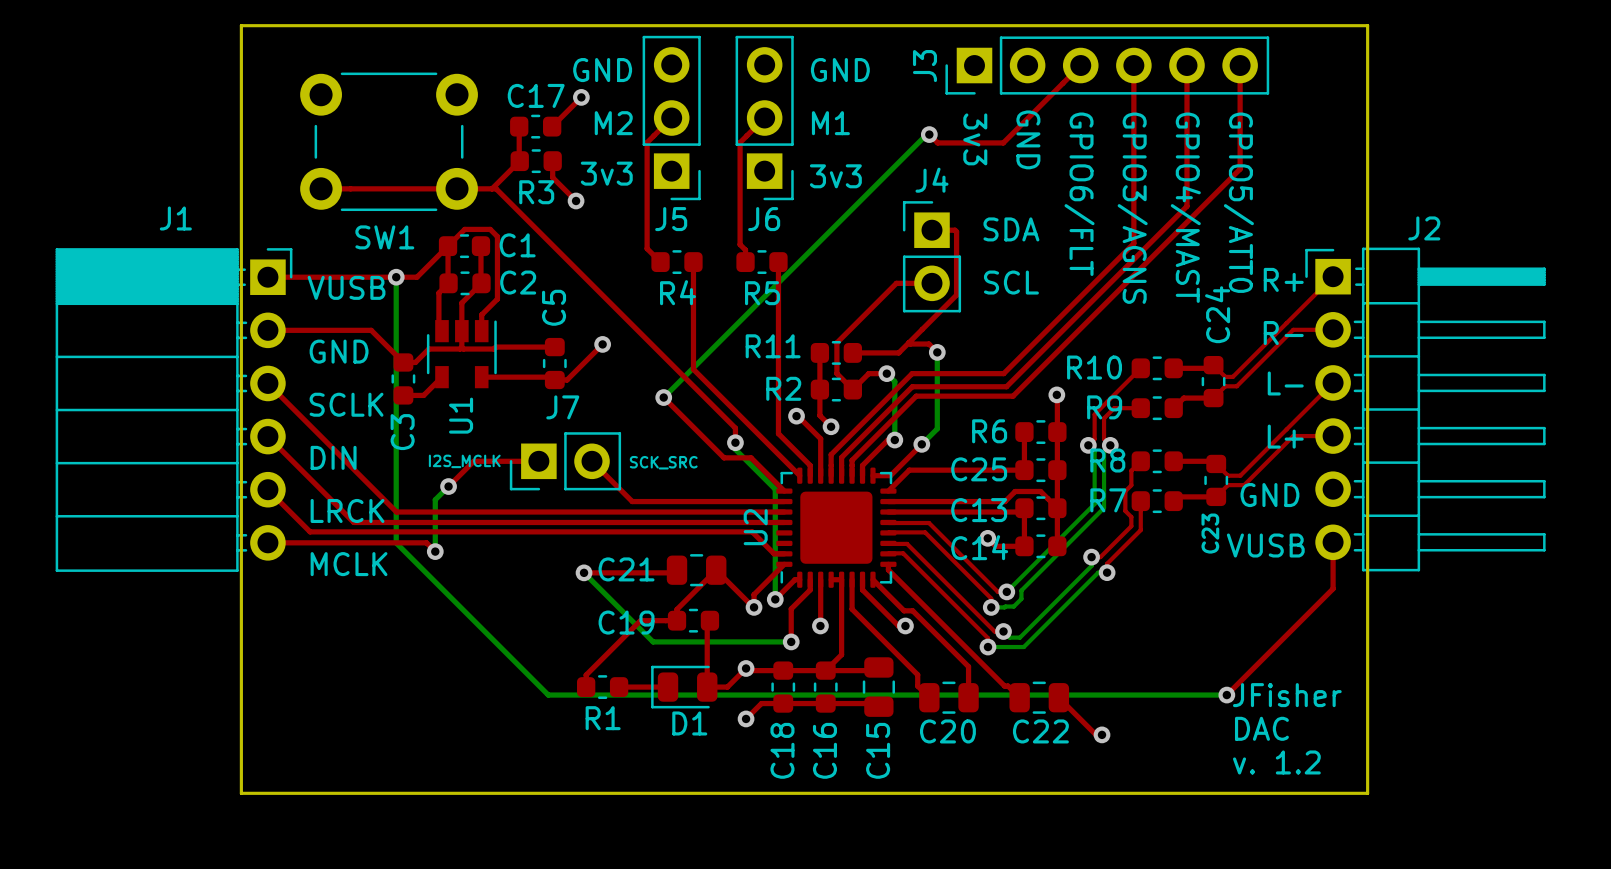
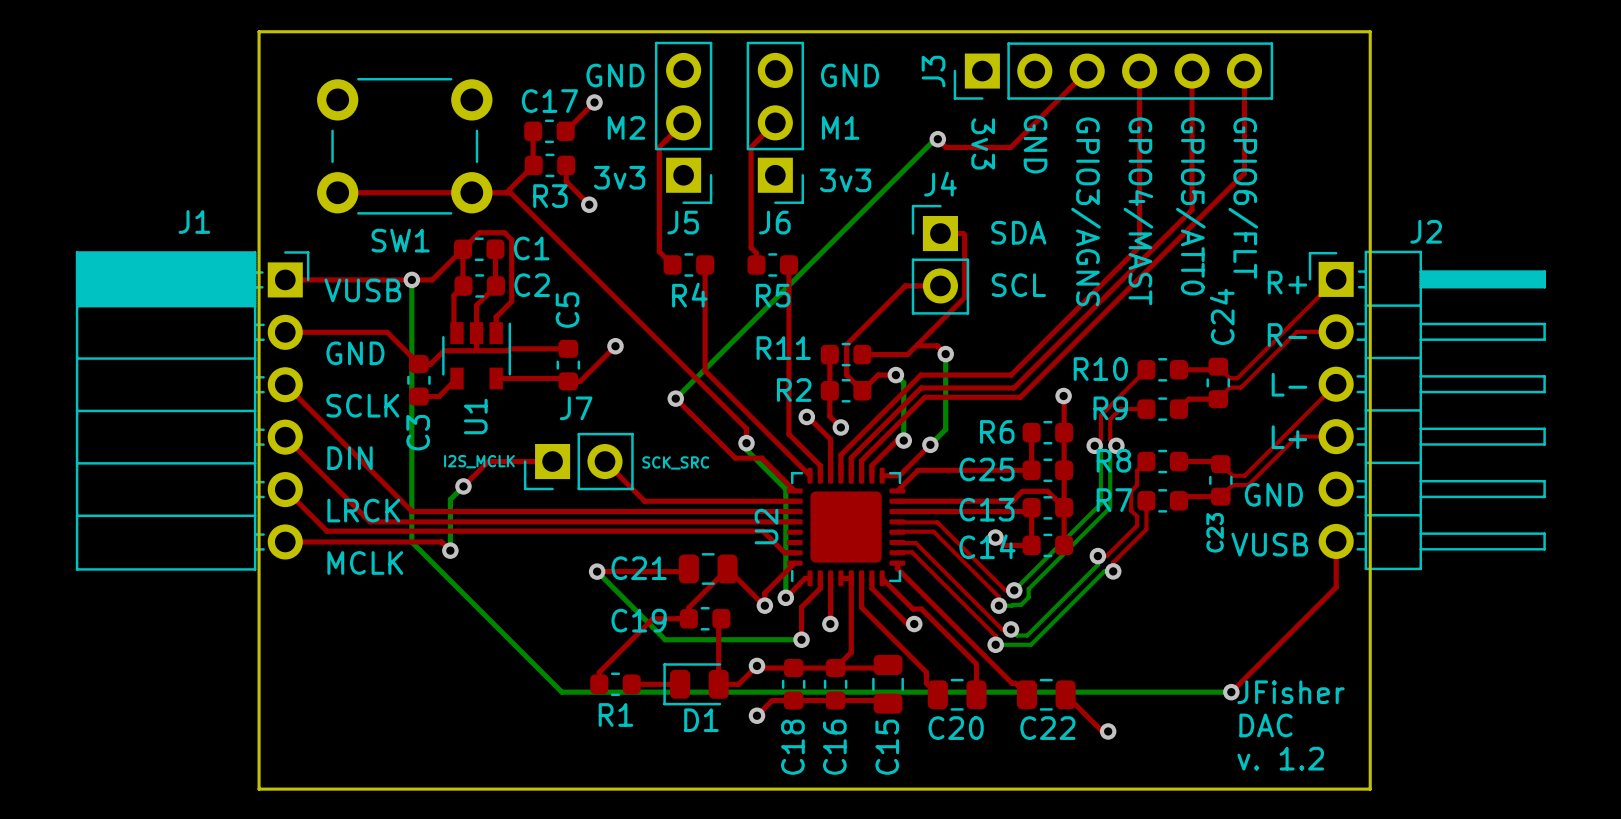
text: GPIO6/FLT (1079, 194) -> GPIO3/AGNS (1086, 211)
text: GPIO5/ATT0 (1238, 202) -> GPIO6/FLT (1243, 198)
text: GPIO4/MAST (1185, 207) -> GPIO5/ATT0 (1190, 206)
text: GPIO3/AGNS (1132, 208) -> GPIO4/MAST (1138, 211)

